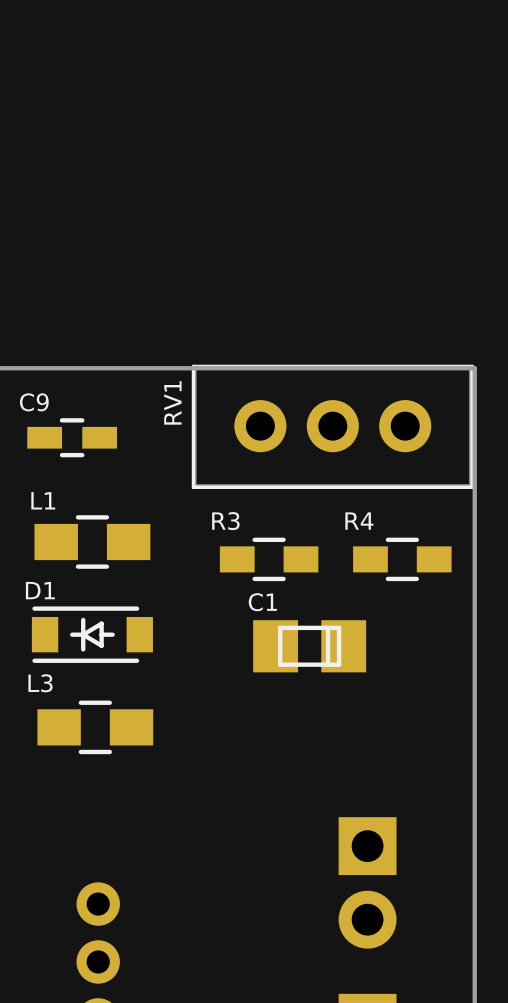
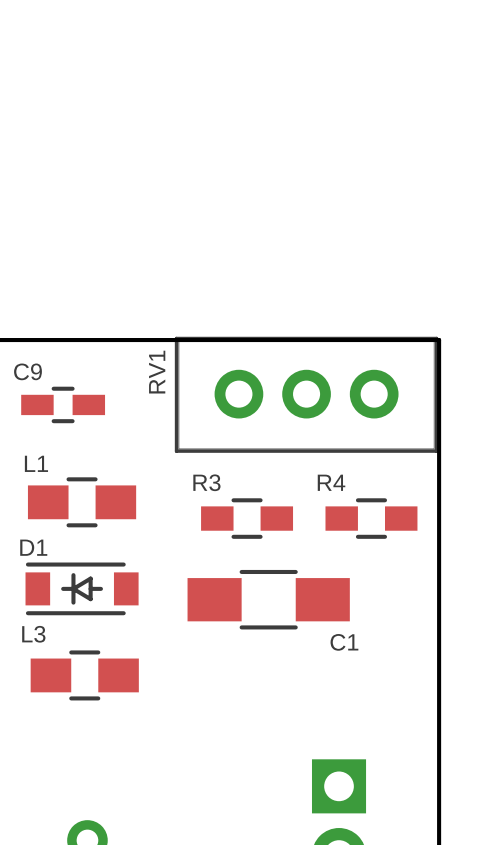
C1 name position: C1 (262, 602) -> C1 (344, 642)
C1 footprint: [253, 620, 367, 673] -> [187, 569, 350, 630]

